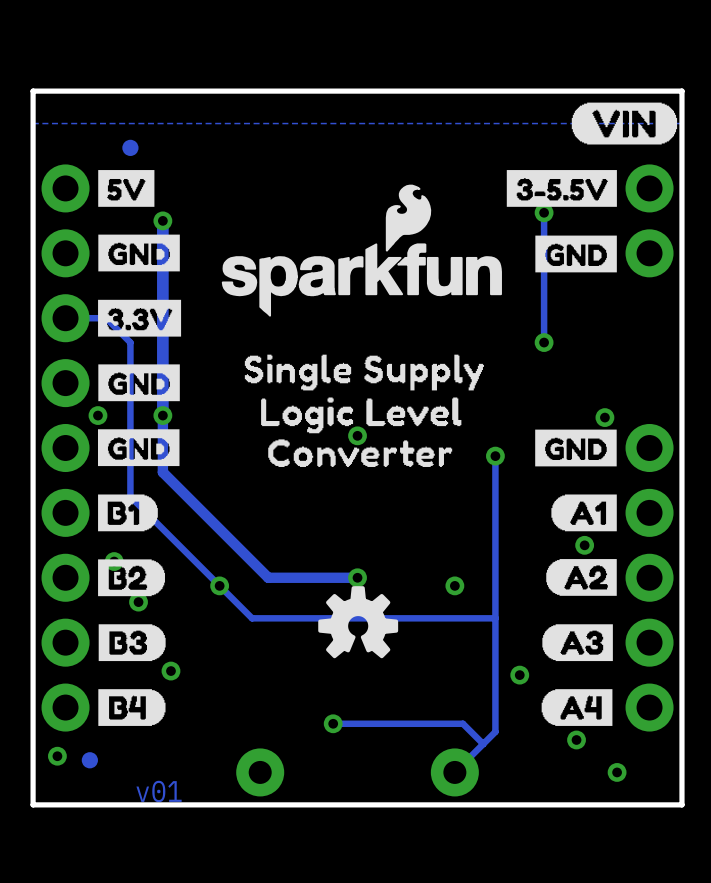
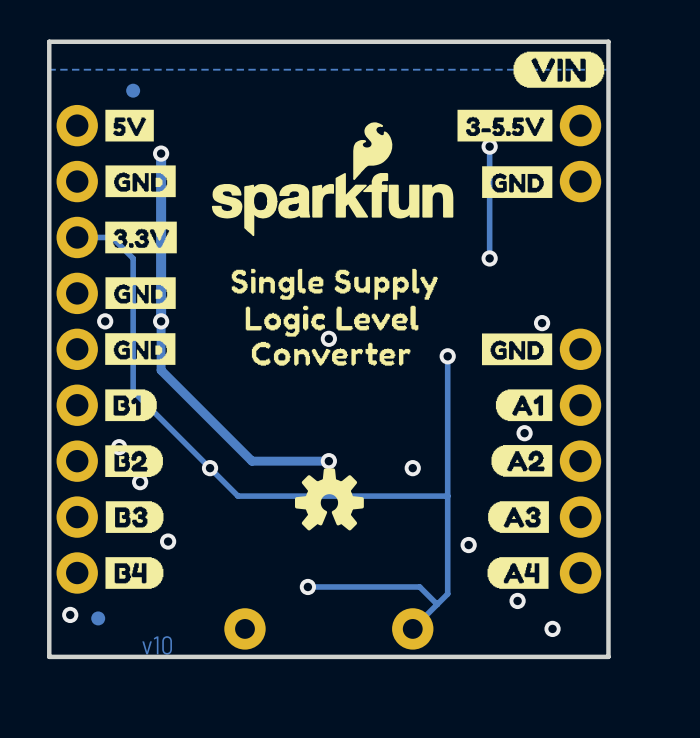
text: v01 (159, 791) -> v10 (157, 645)

